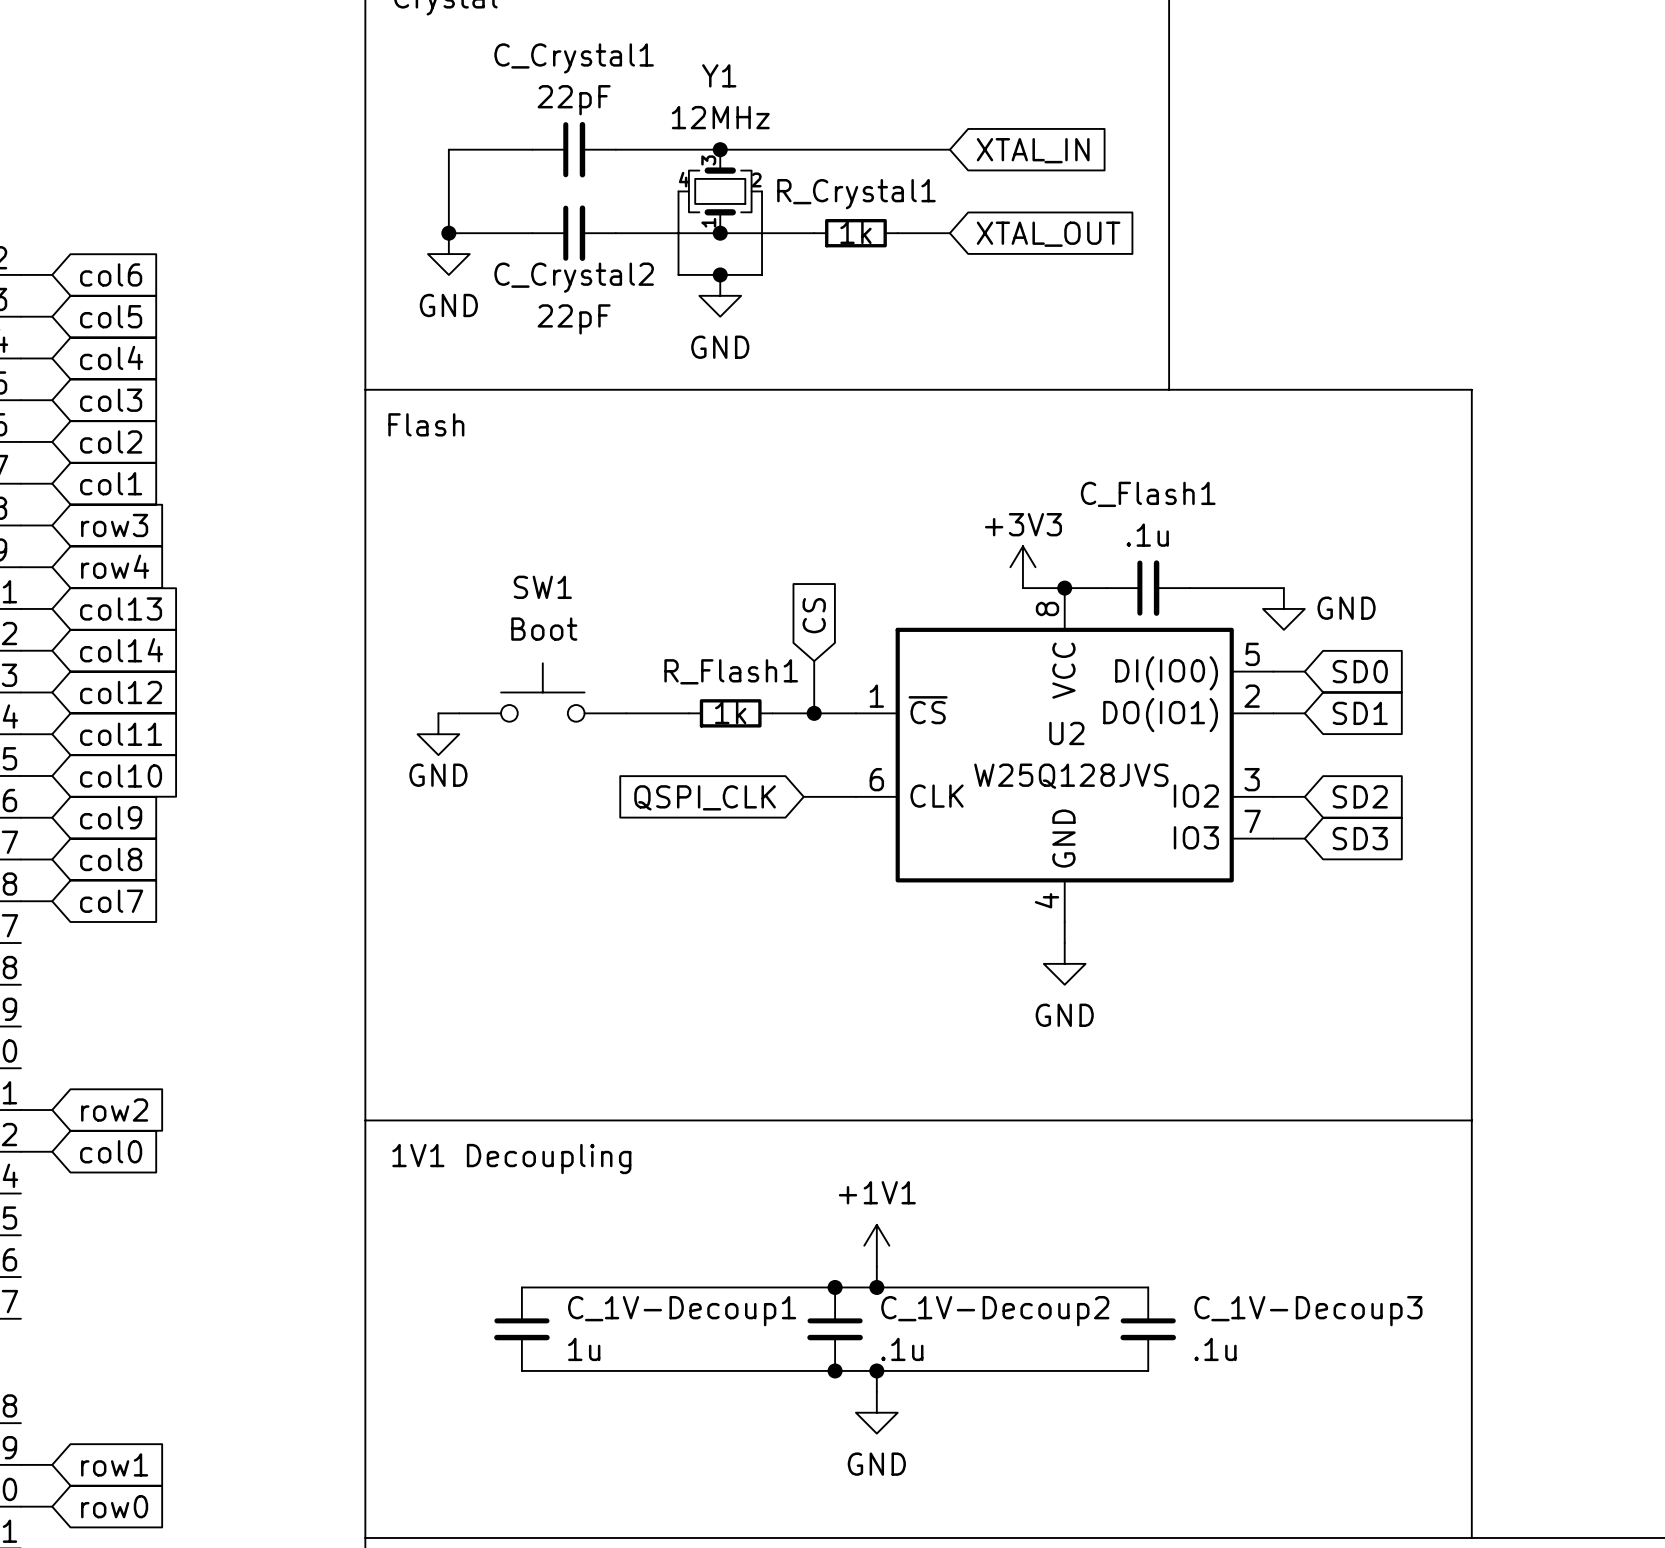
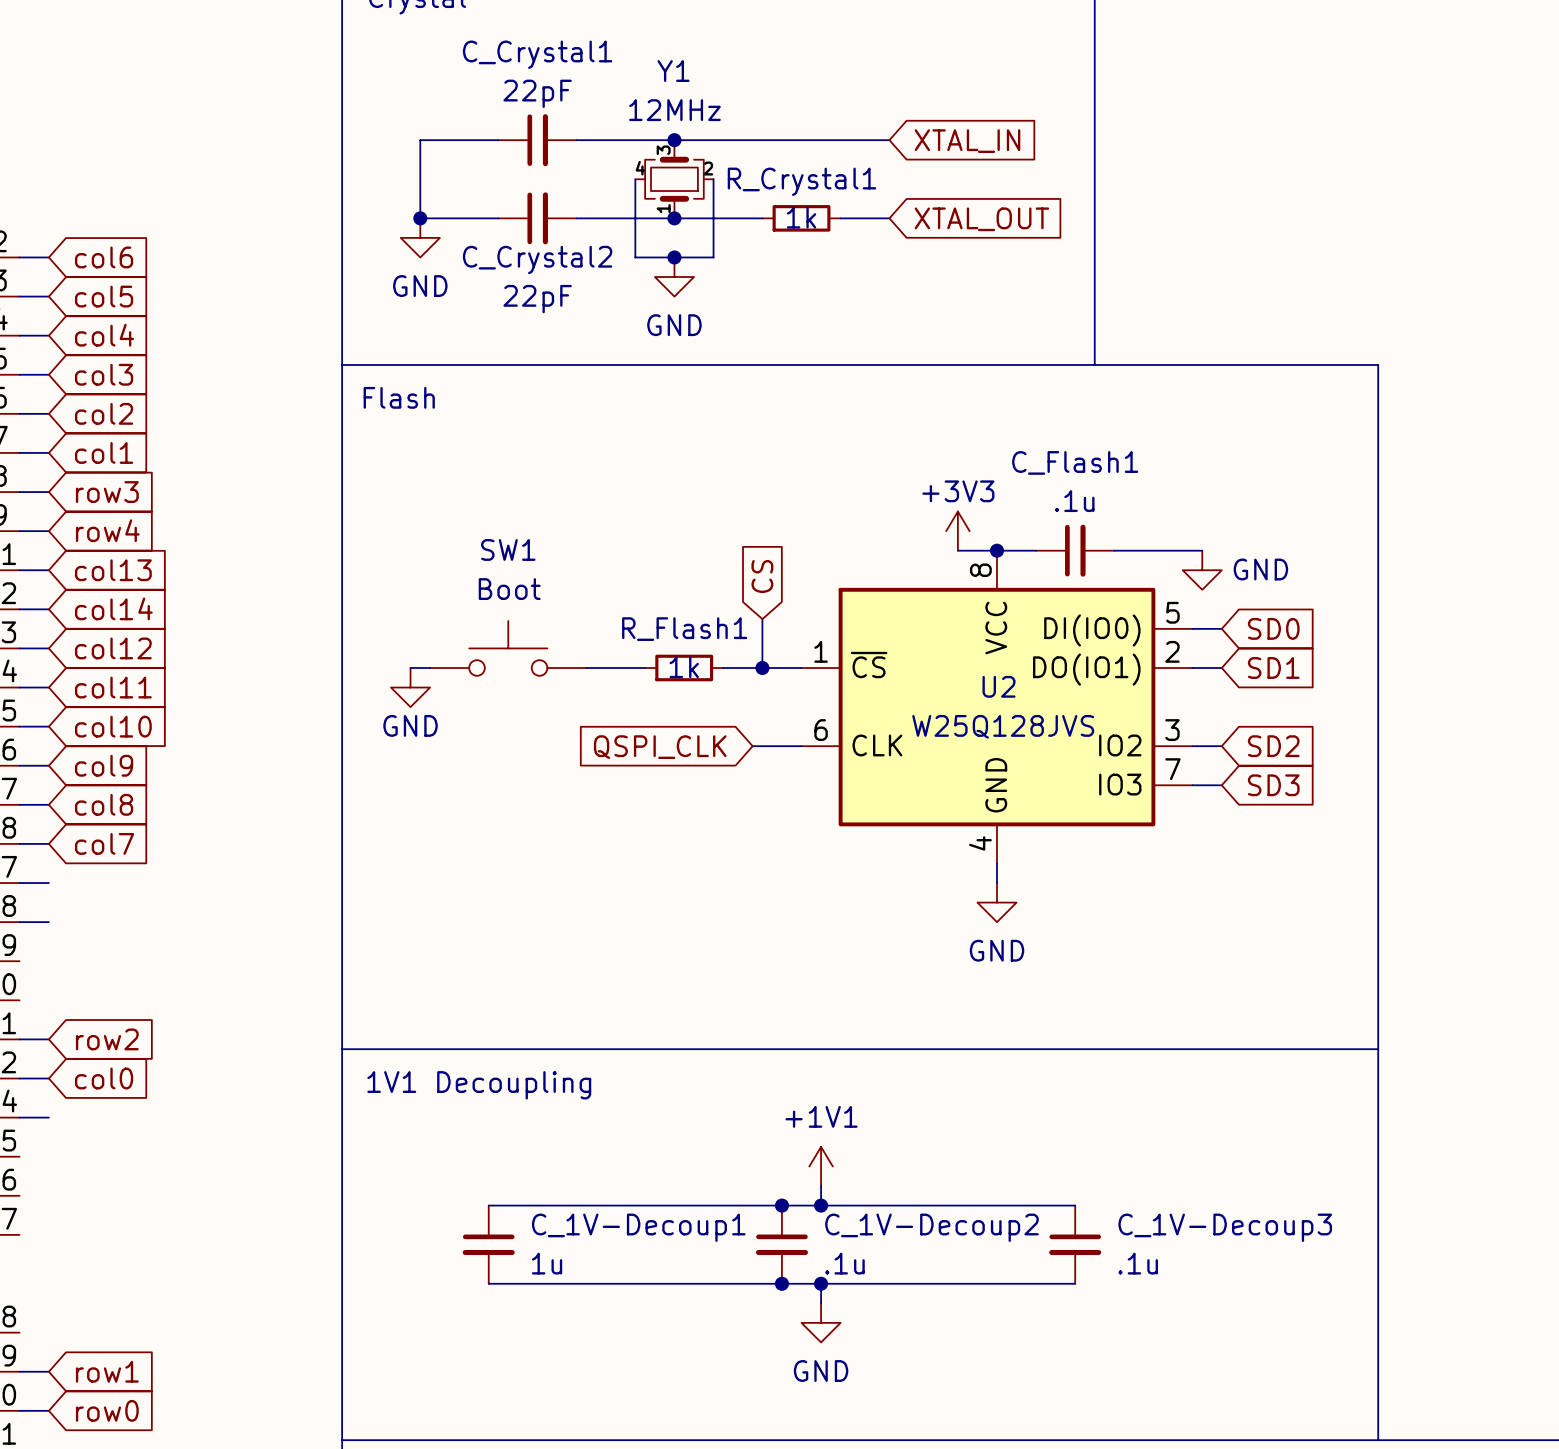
wire: none -> (19, 883) (48, 883)
wire: none -> (19, 922) (48, 922)
wire: none -> (19, 1117) (48, 1117)

